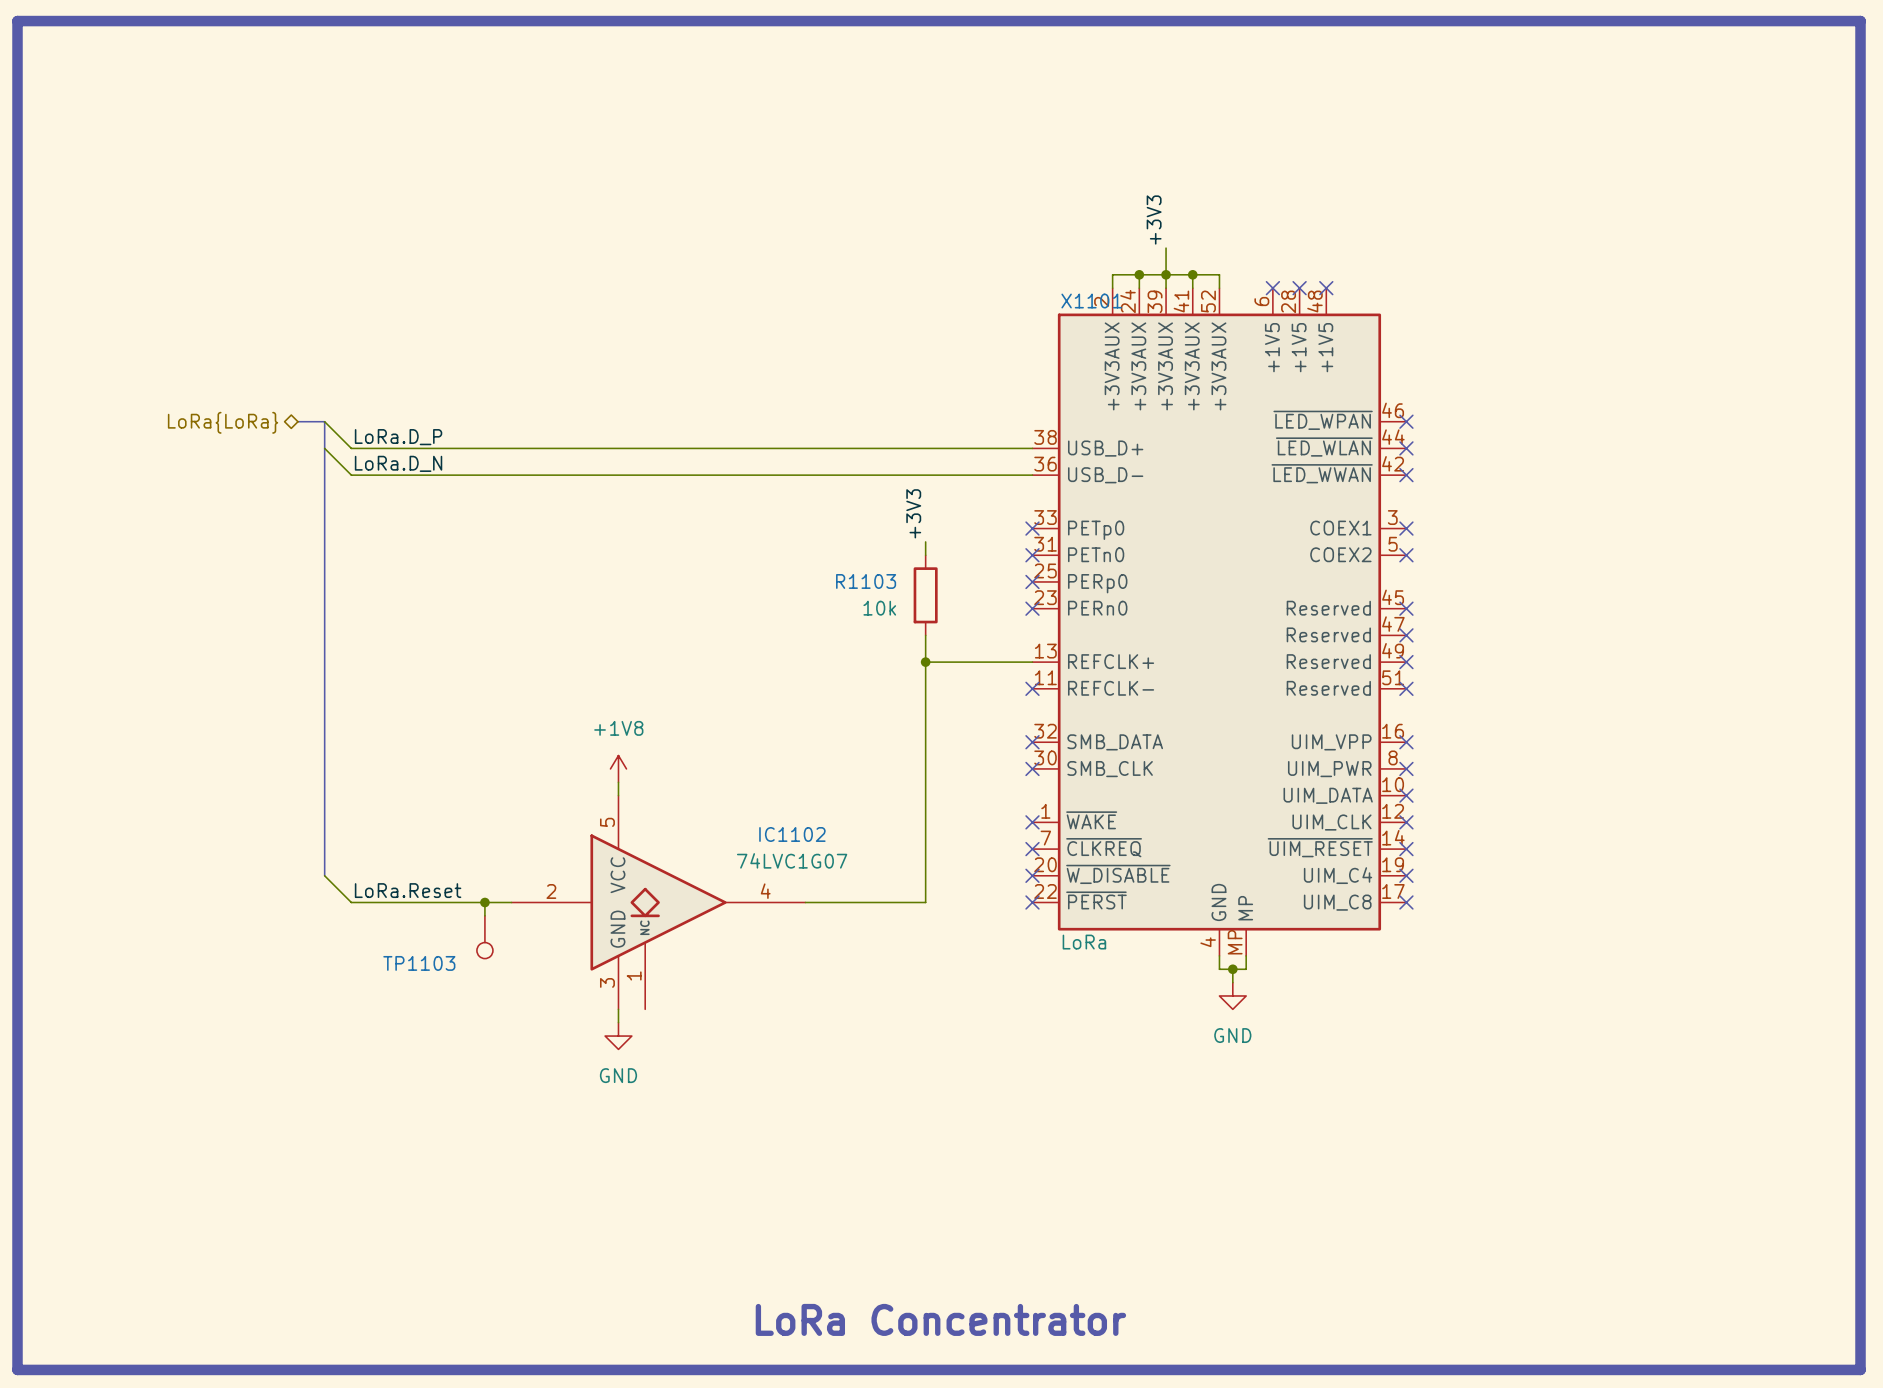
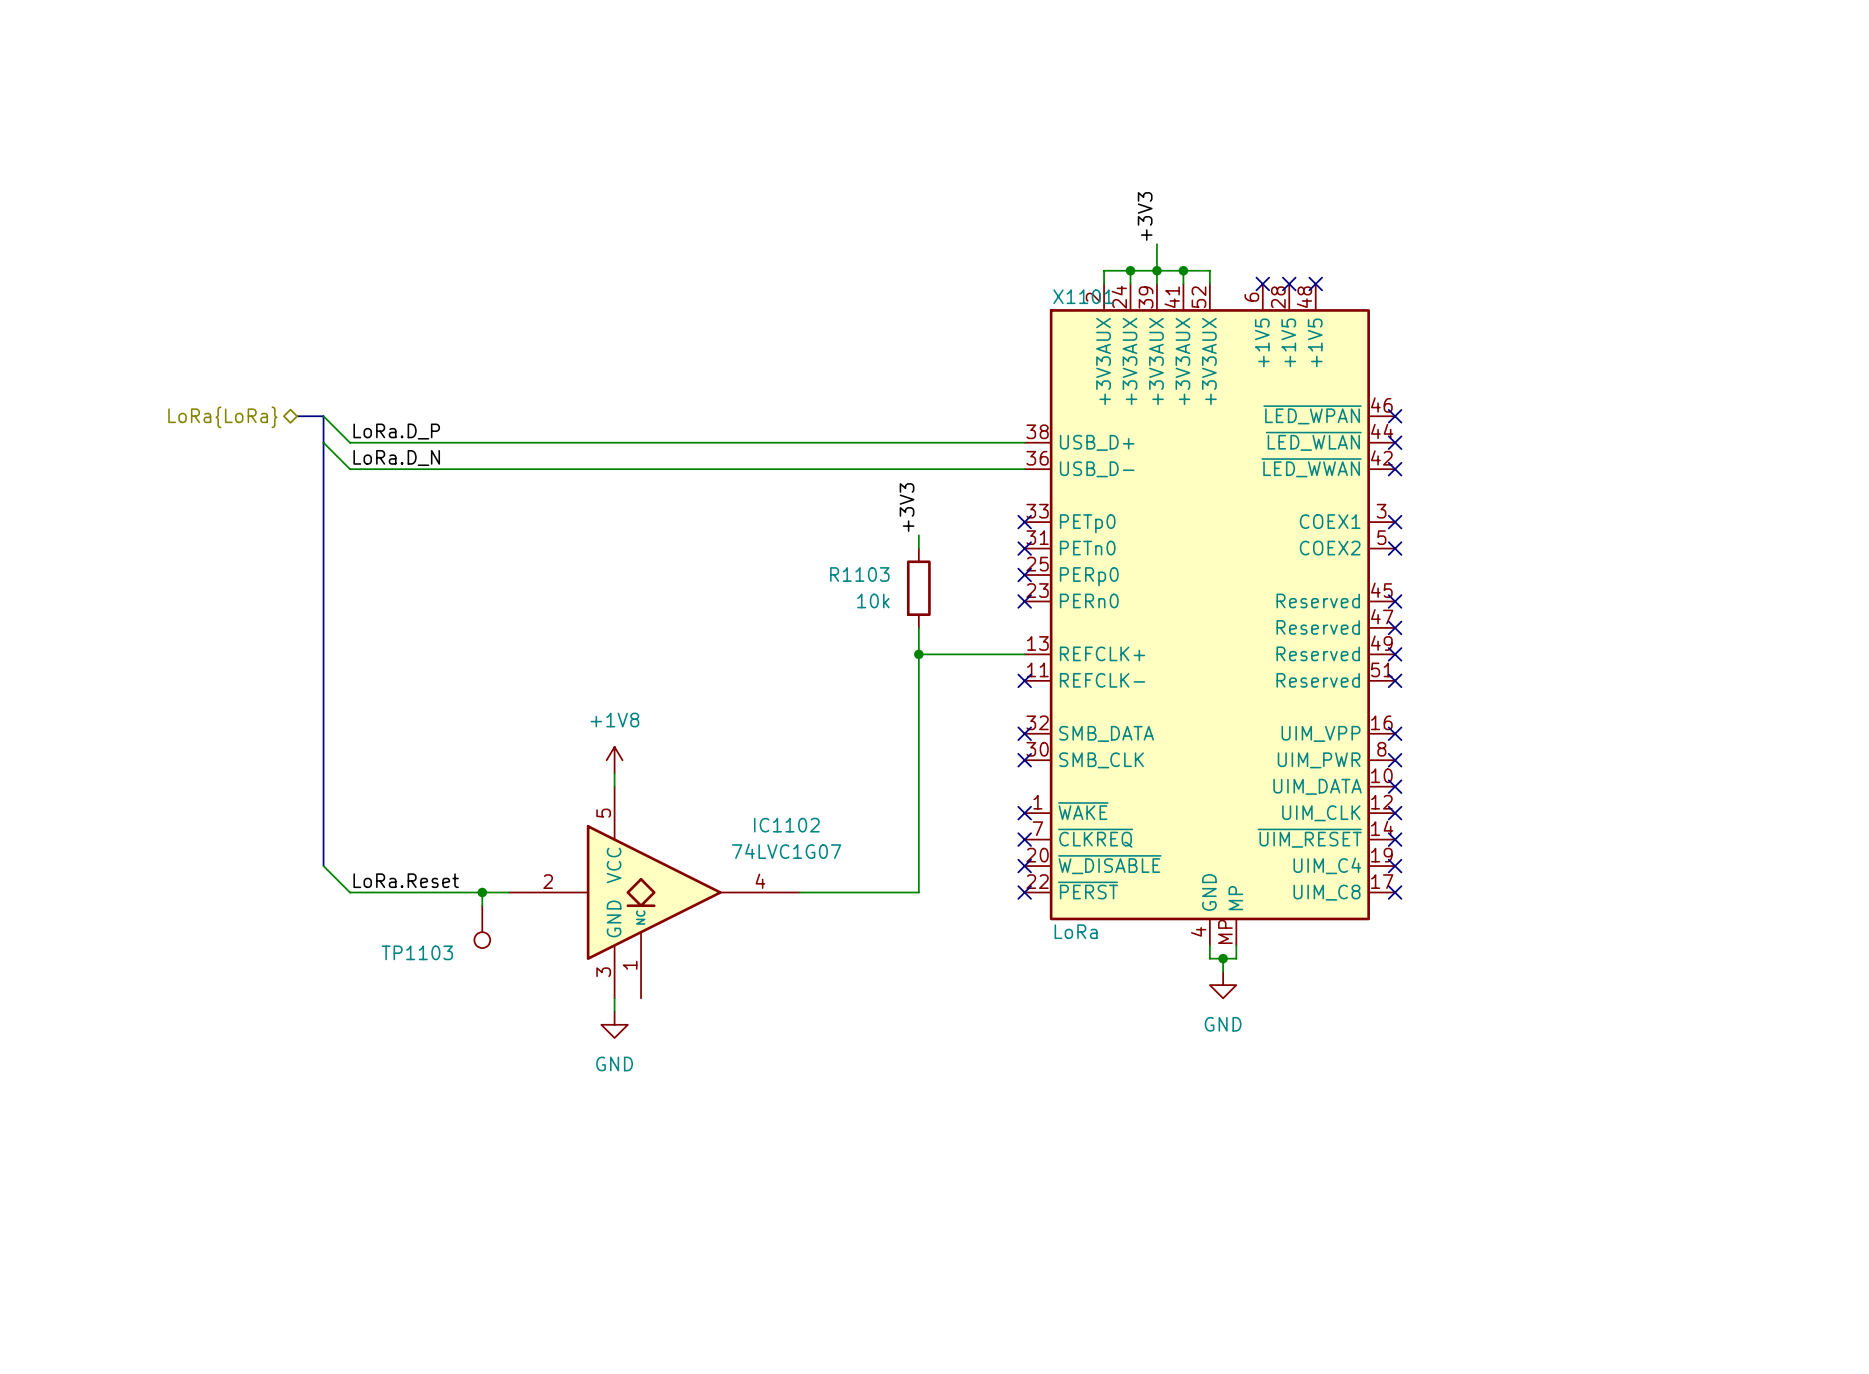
line: (17, 21) (1860, 21) (1860, 1369) (17, 1369) (17, 21) -> none
text: LoRa Concentrator (940, 1319) -> none

